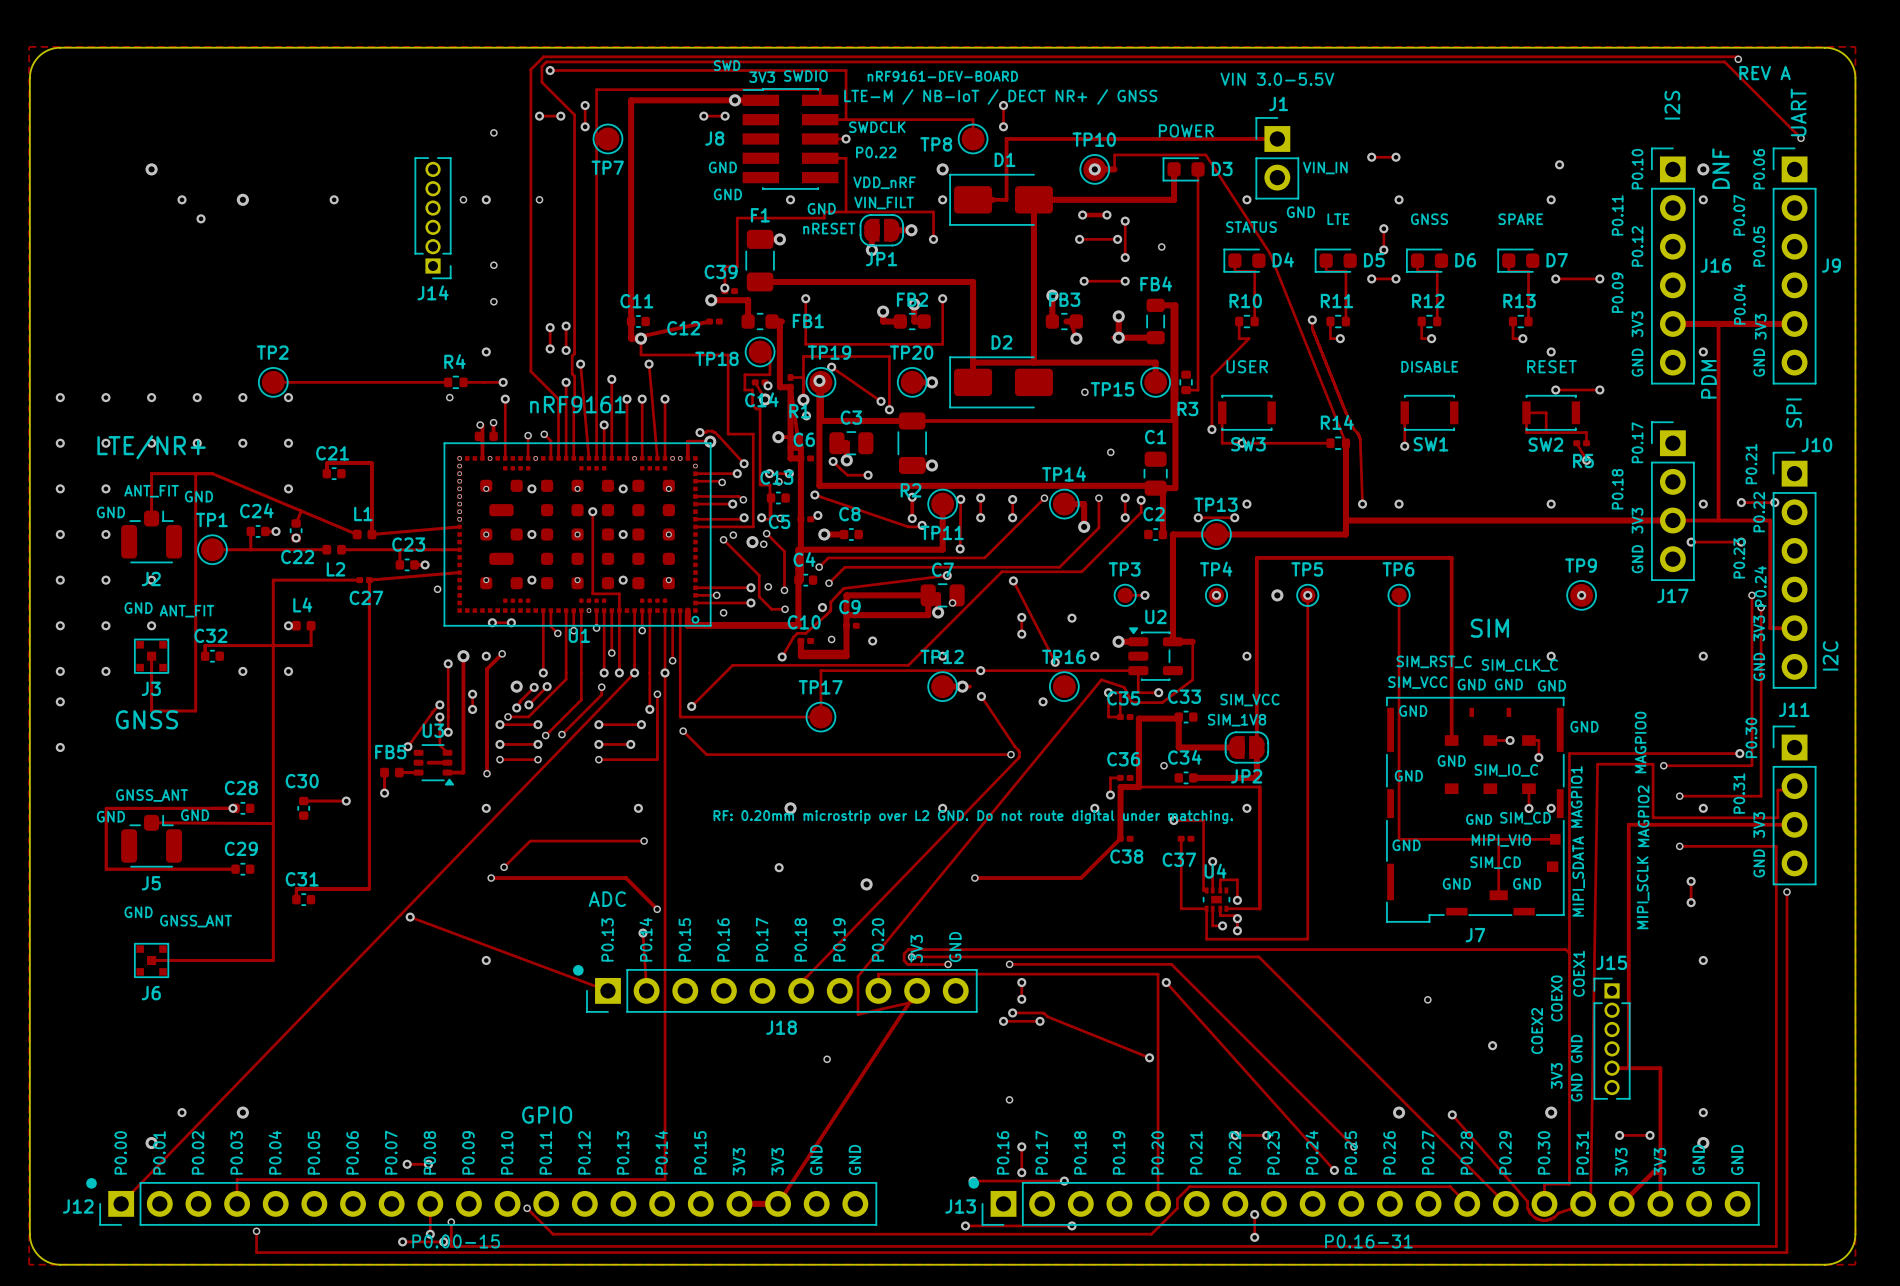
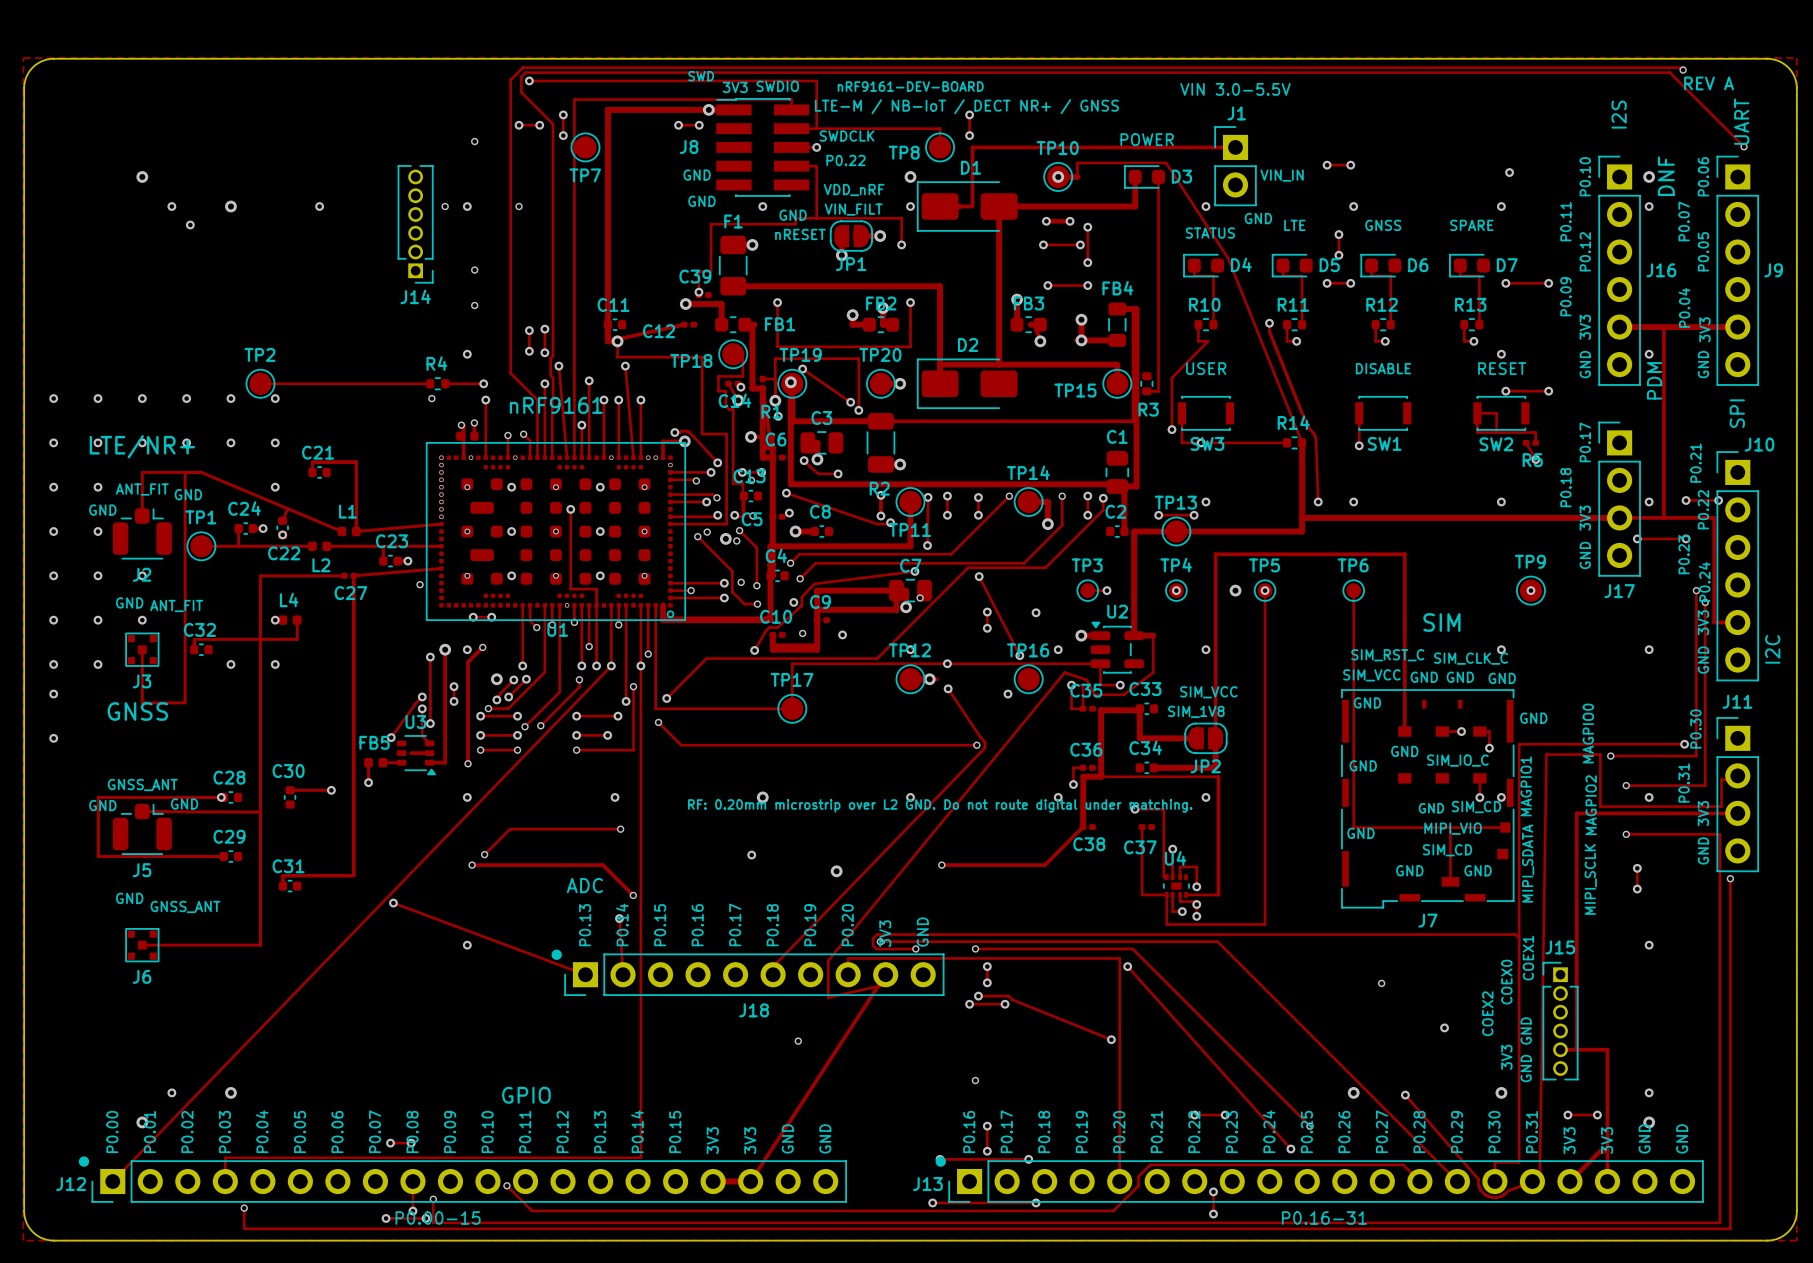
via: (1161, 246) -> none
via: (1084, 392) -> none
via: (1110, 452) -> none
via: (723, 612) -> none
via: (1164, 765) -> none

